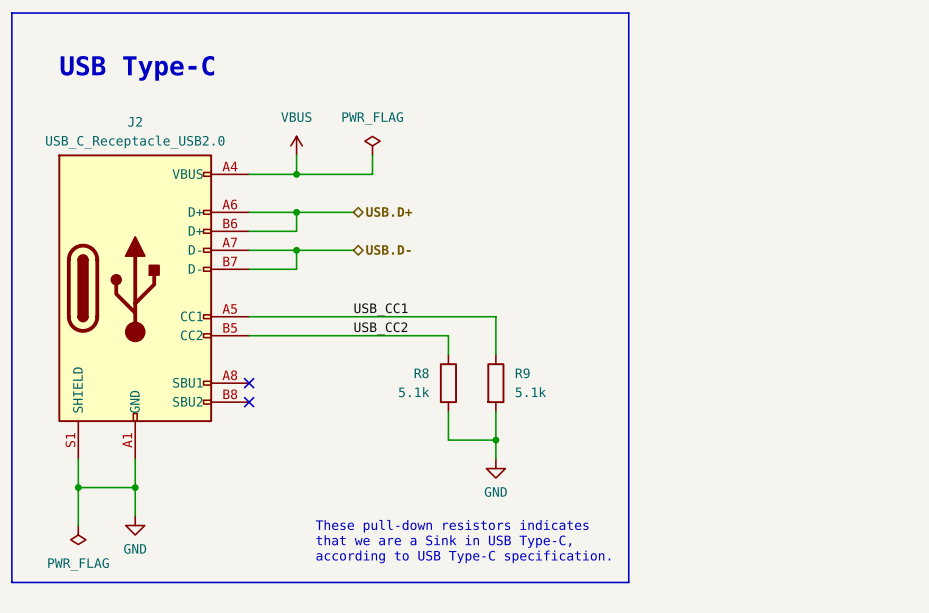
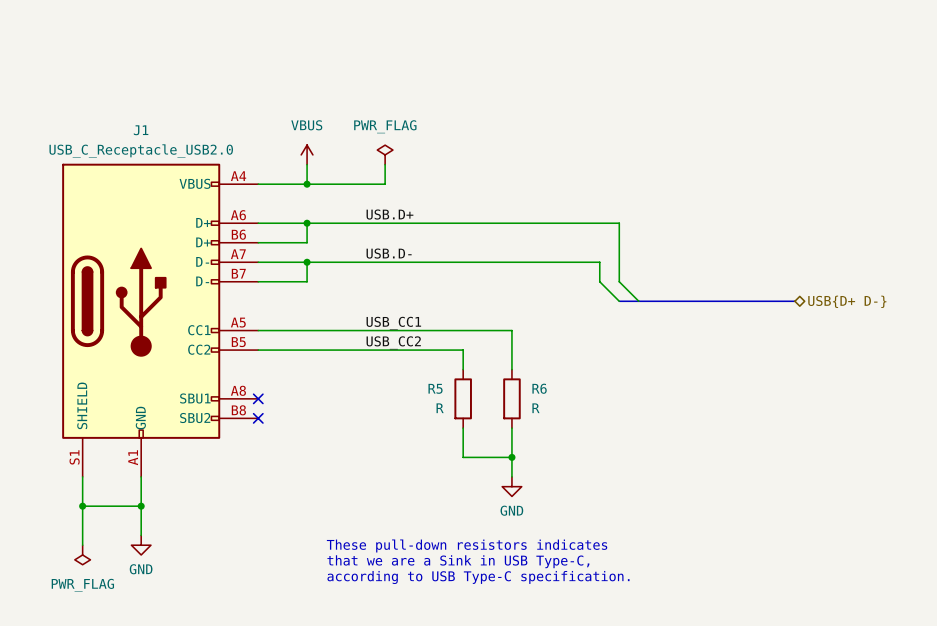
line: (11, 13) (628, 13) (628, 582) (11, 582) (11, 13) -> none
text: USB Type-C (137, 68) -> none
J2 name: J2 (135, 121) -> J1 (141, 130)
label: none -> USB.D+ (389, 214)
hierarchical label: USB.D+ (389, 211) -> none
wire: none -> (365, 223) (619, 223) (619, 281) (638, 301)
label: none -> USB.D- (389, 253)
hierarchical label: USB.D- (388, 249) -> none
wire: none -> (365, 262) (599, 262) (599, 281) (619, 301)
bus: none -> (619, 301) (794, 301)
hierarchical label: none -> USB{D+ D-} (847, 301)
R8 name: R8 (421, 373) -> R5 (435, 388)
R9 name: R9 (522, 373) -> R6 (539, 388)
R8 value: 5.1k (414, 392) -> R (440, 408)
R9 value: 5.1k (530, 392) -> R (535, 408)

